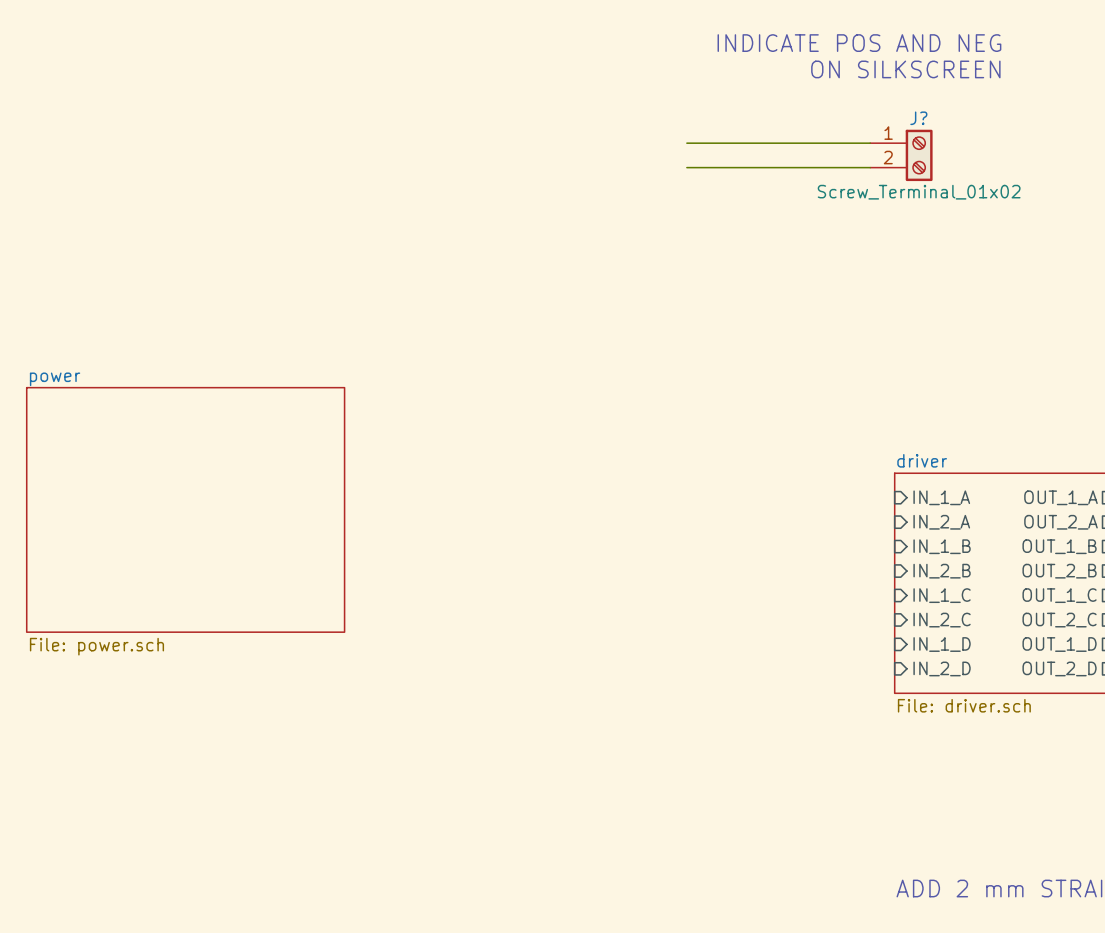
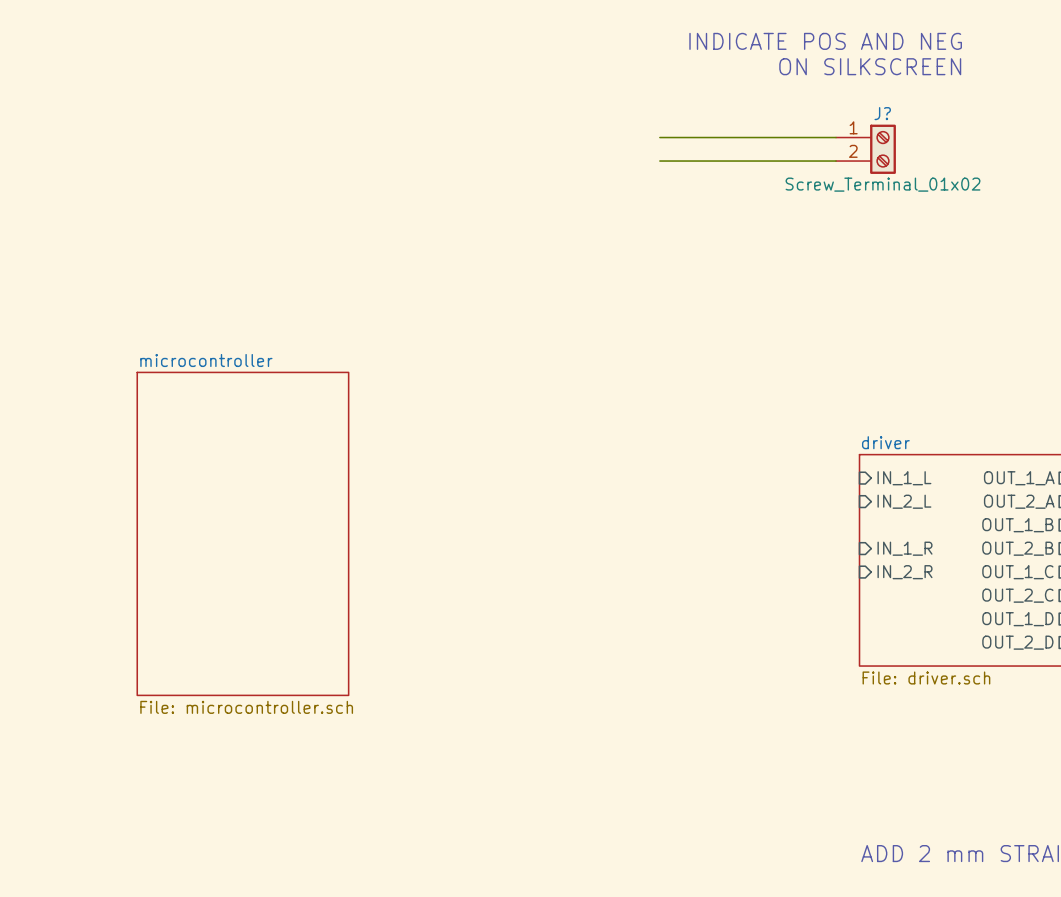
sheet pin: IN_1_A (941, 497) -> IN_1_L (904, 478)
sheet power: File: power.sch (185, 509) -> none
sheet pin: IN_2_A (941, 522) -> IN_2_L (904, 501)
sheet pin: IN_1_B (942, 546) -> none
sheet microcontroller: none -> File: microcontroller.sch (242, 533)
sheet pin: IN_2_B (942, 571) -> IN_1_R (904, 548)
sheet pin: IN_1_C (942, 595) -> IN_2_R (904, 572)
sheet pin: IN_2_C (942, 620) -> none
sheet pin: IN_1_D (942, 644) -> none
sheet pin: IN_2_D (942, 668) -> none

